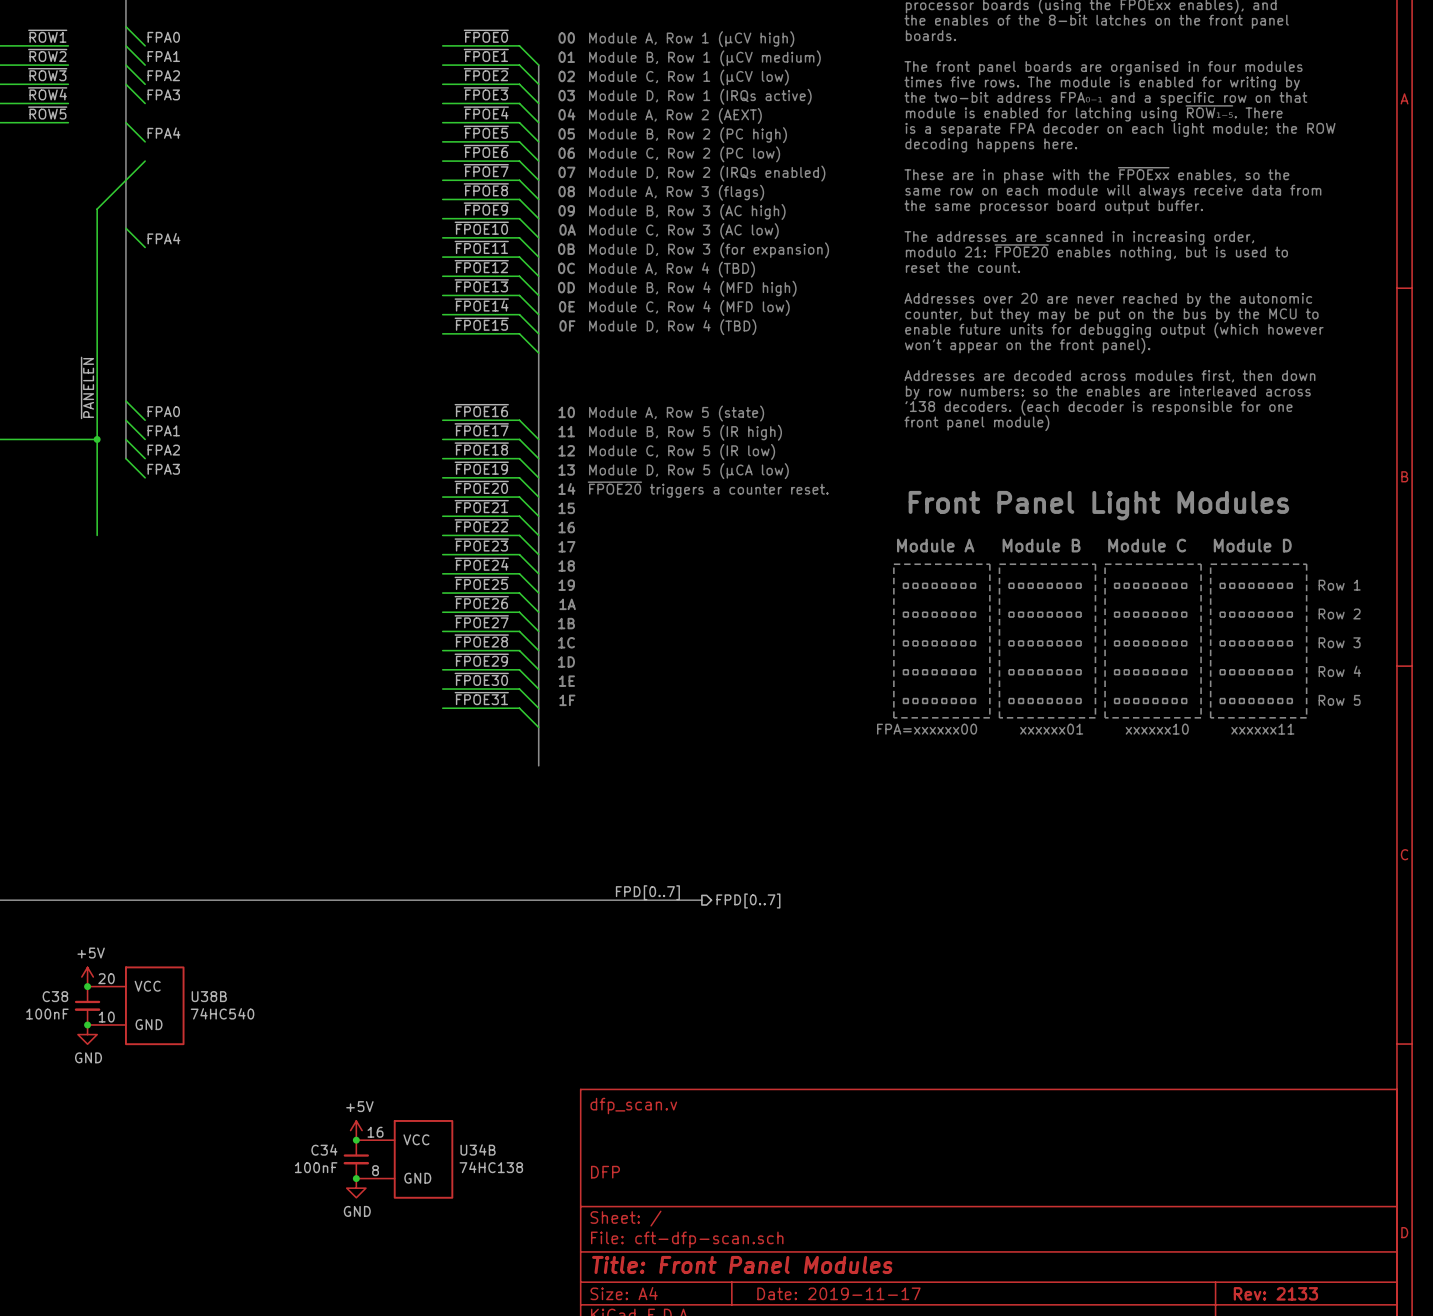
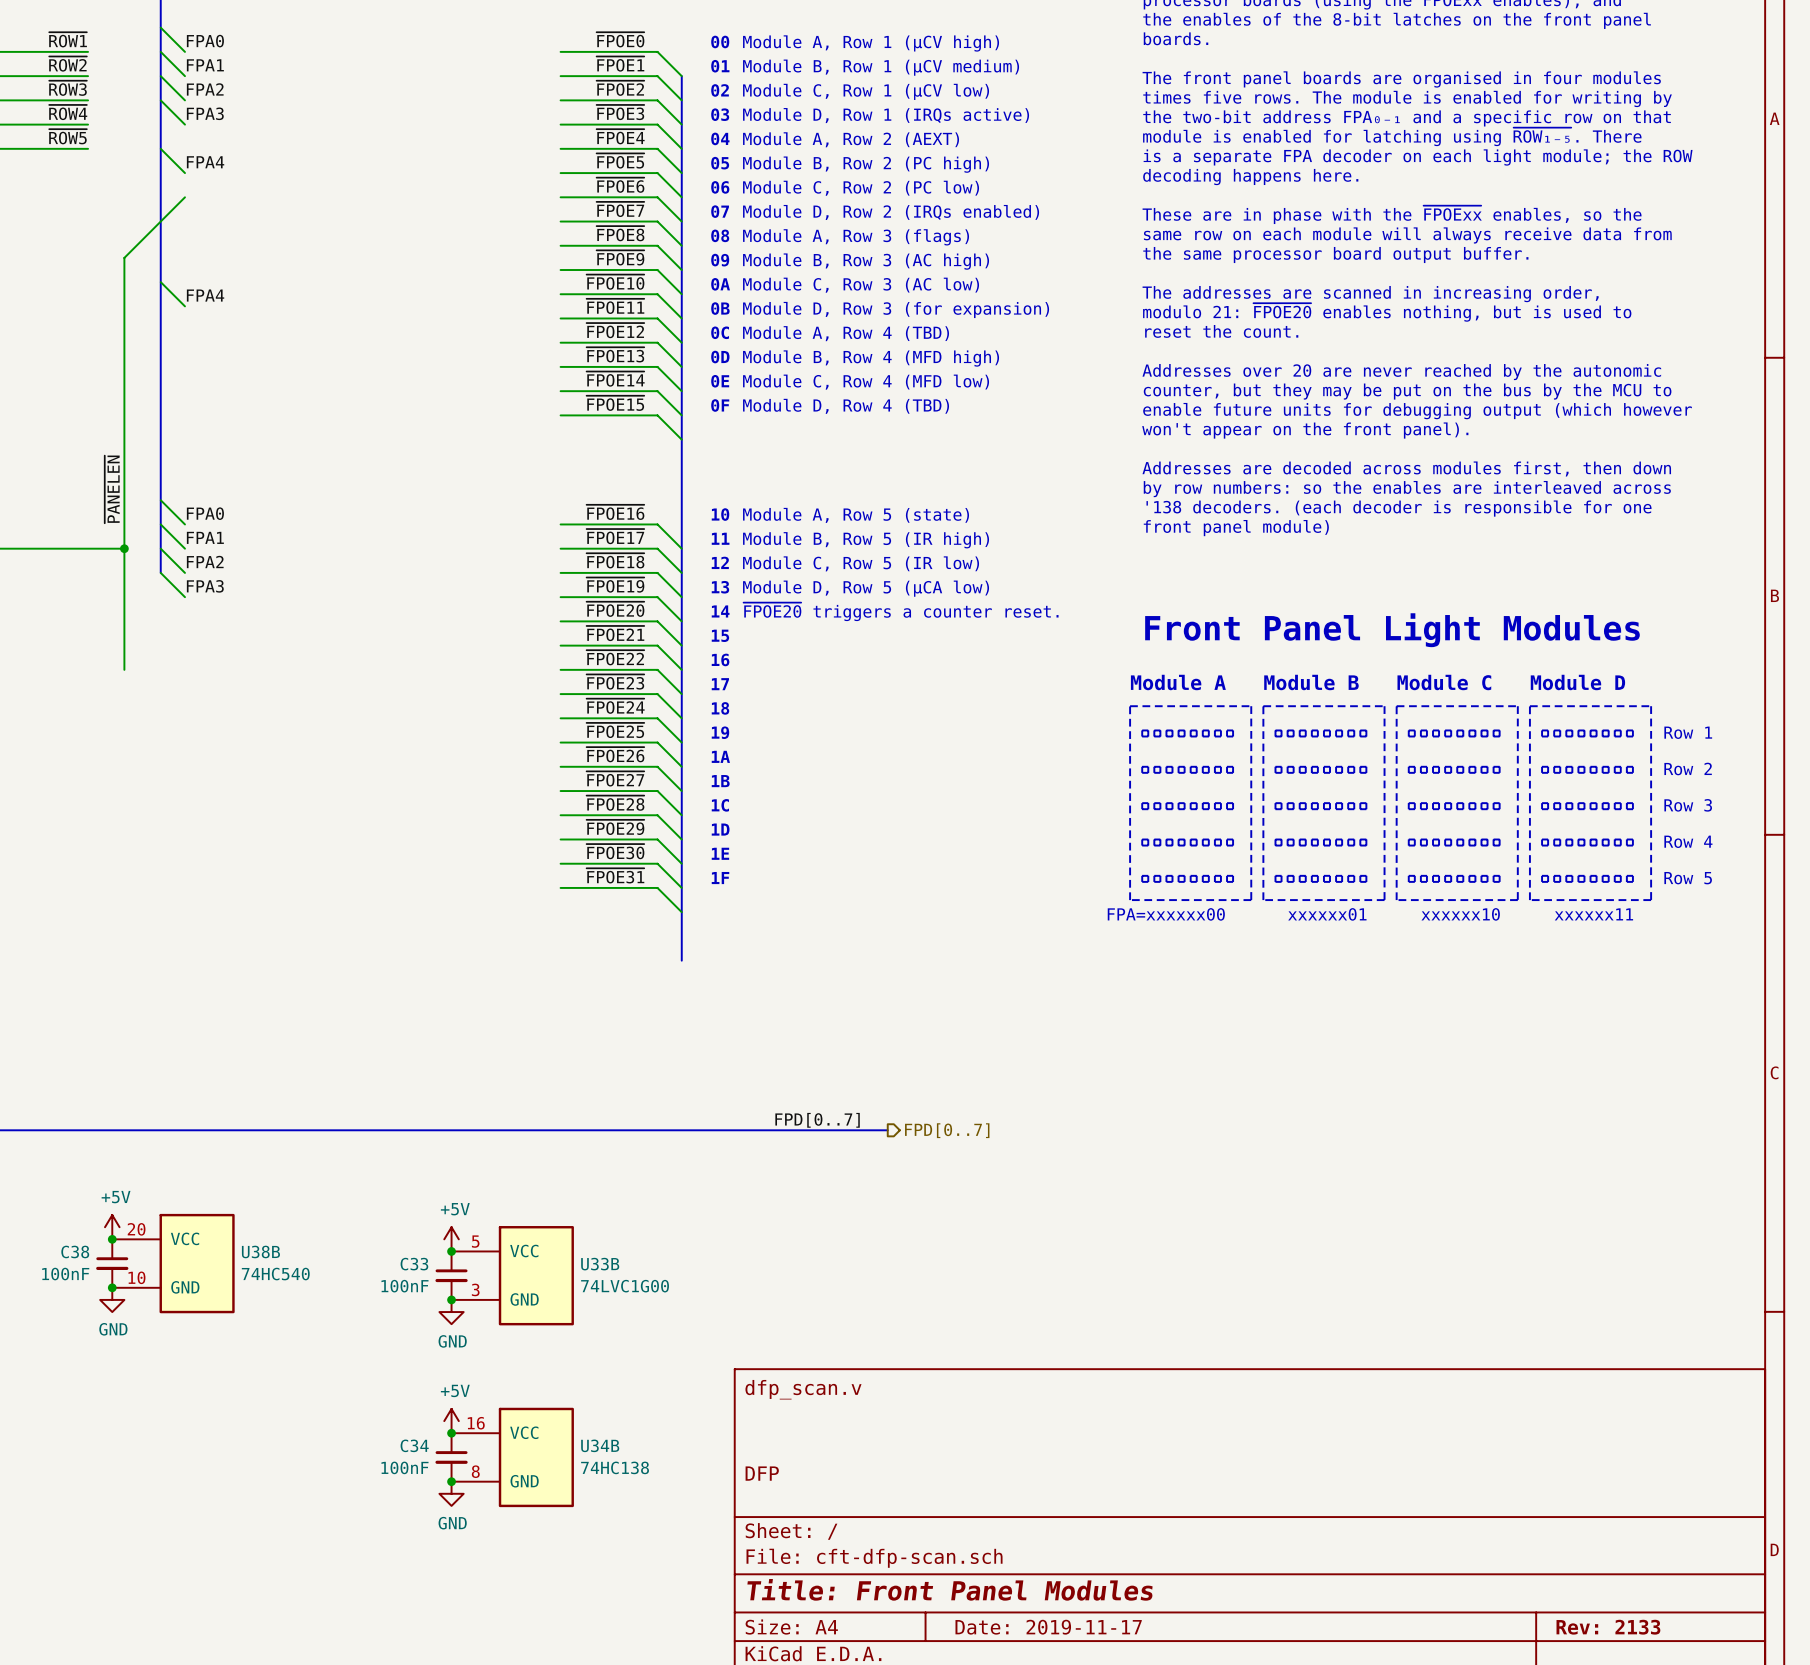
power symbol: none -> +5V (451, 1239)
junction: none -> (451, 1251)
C33: none -> 100nF (451, 1275)
U33B: none -> 74LVC1G00 (512, 1275)
junction: none -> (451, 1299)
power symbol: none -> GND (451, 1312)

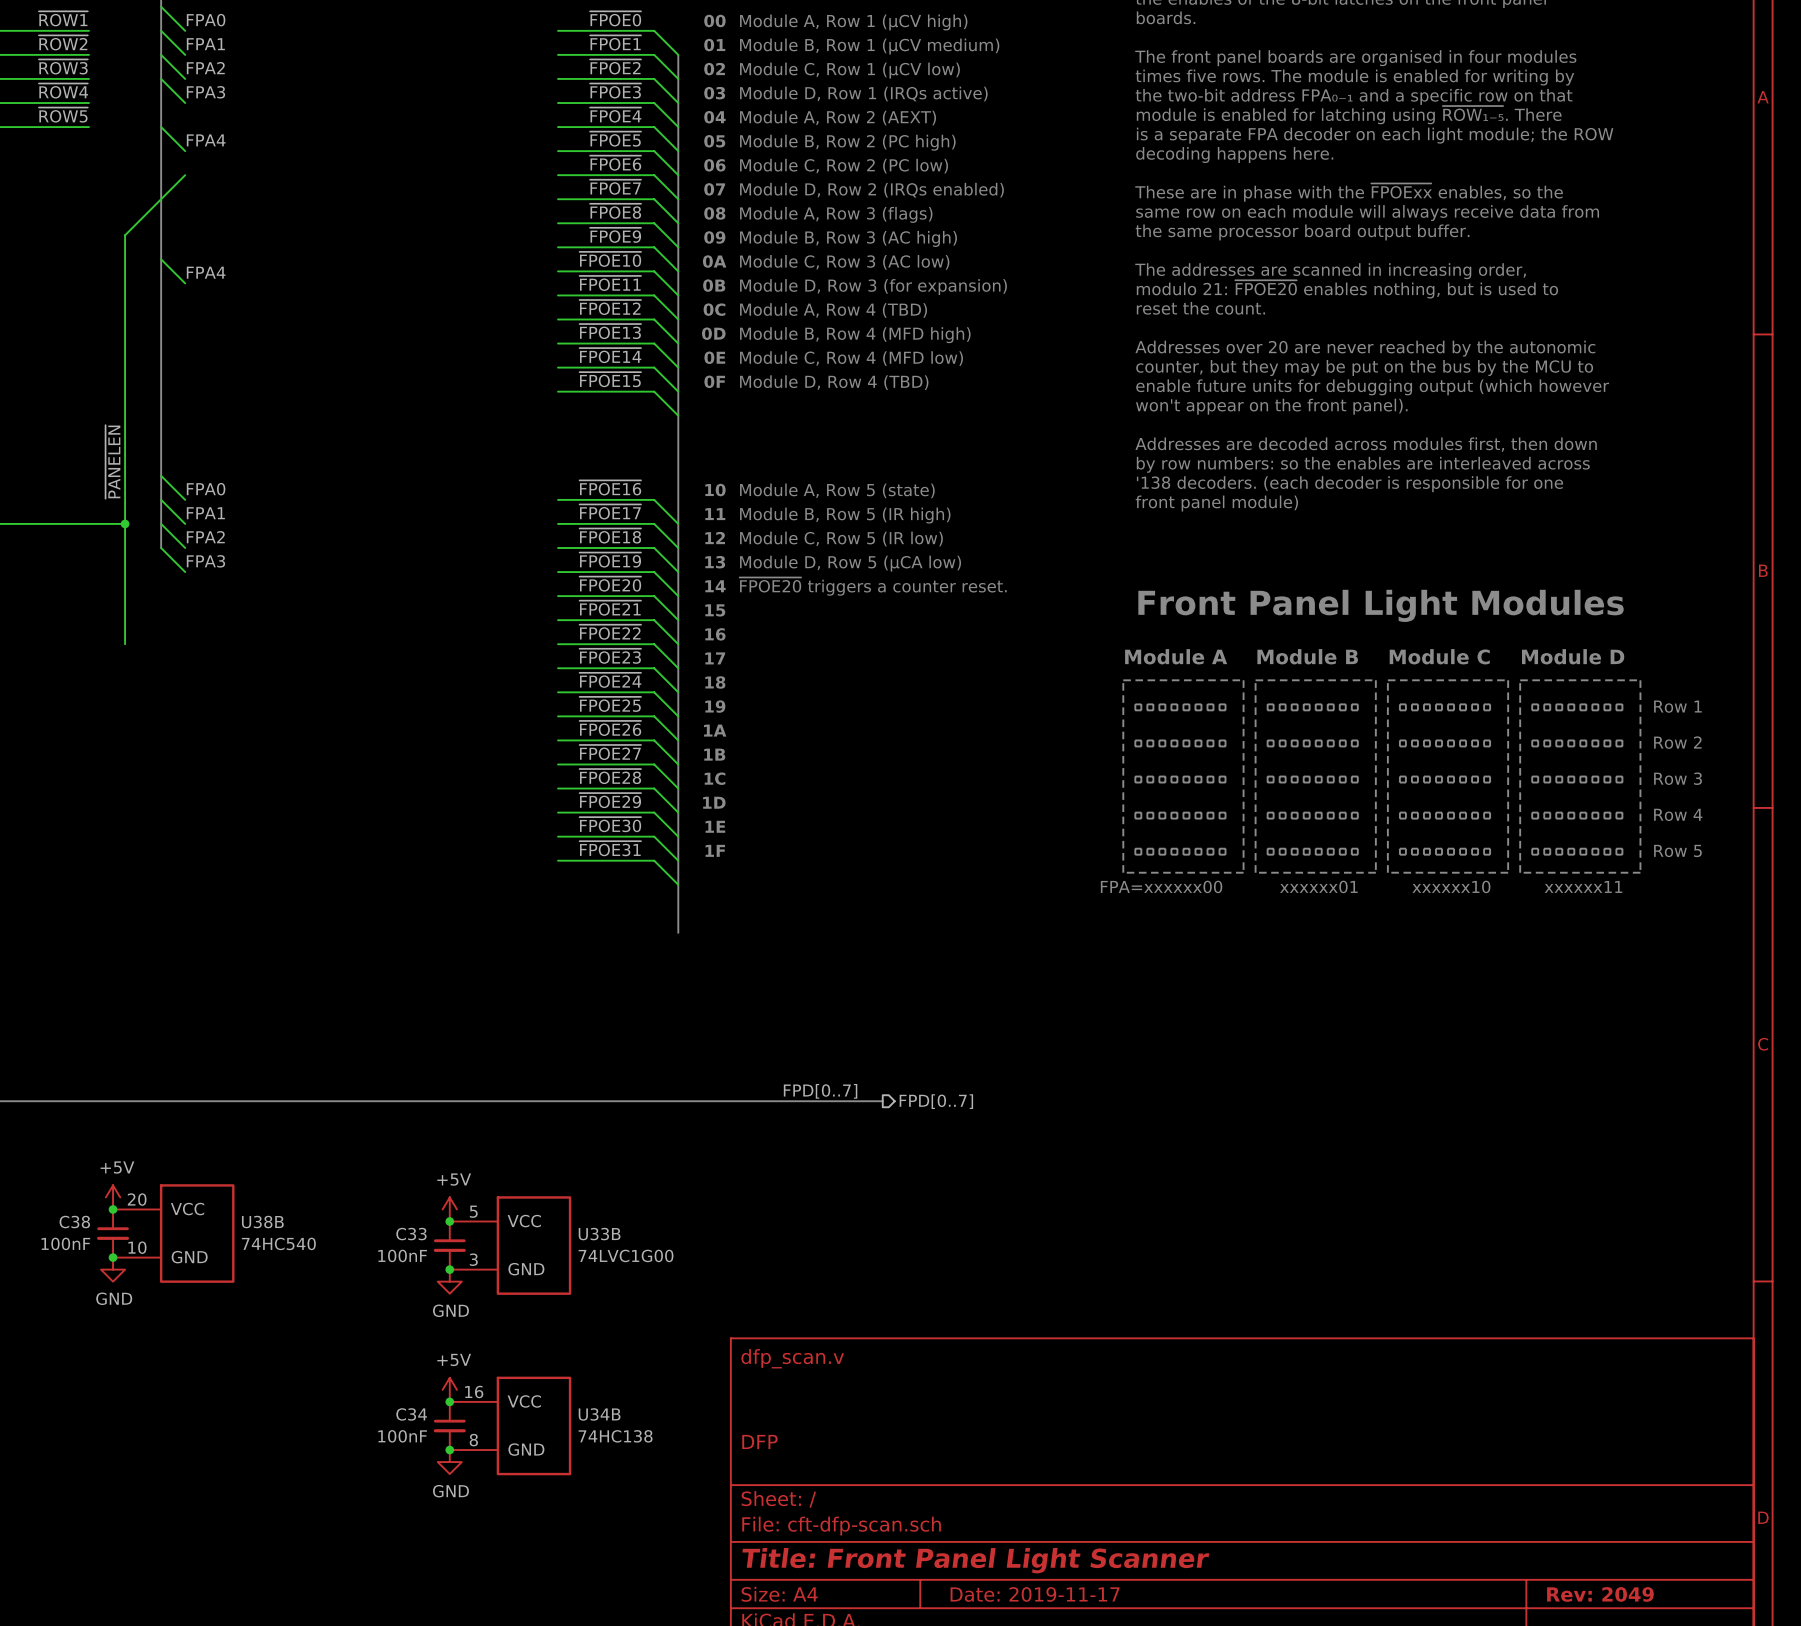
title block: Title: Front Panel Modules (950, 1589) -> Title: Front Panel Light Scanner (975, 1560)
title block: Rev: 2133 (1608, 1627) -> Rev: 2049 (1600, 1594)

